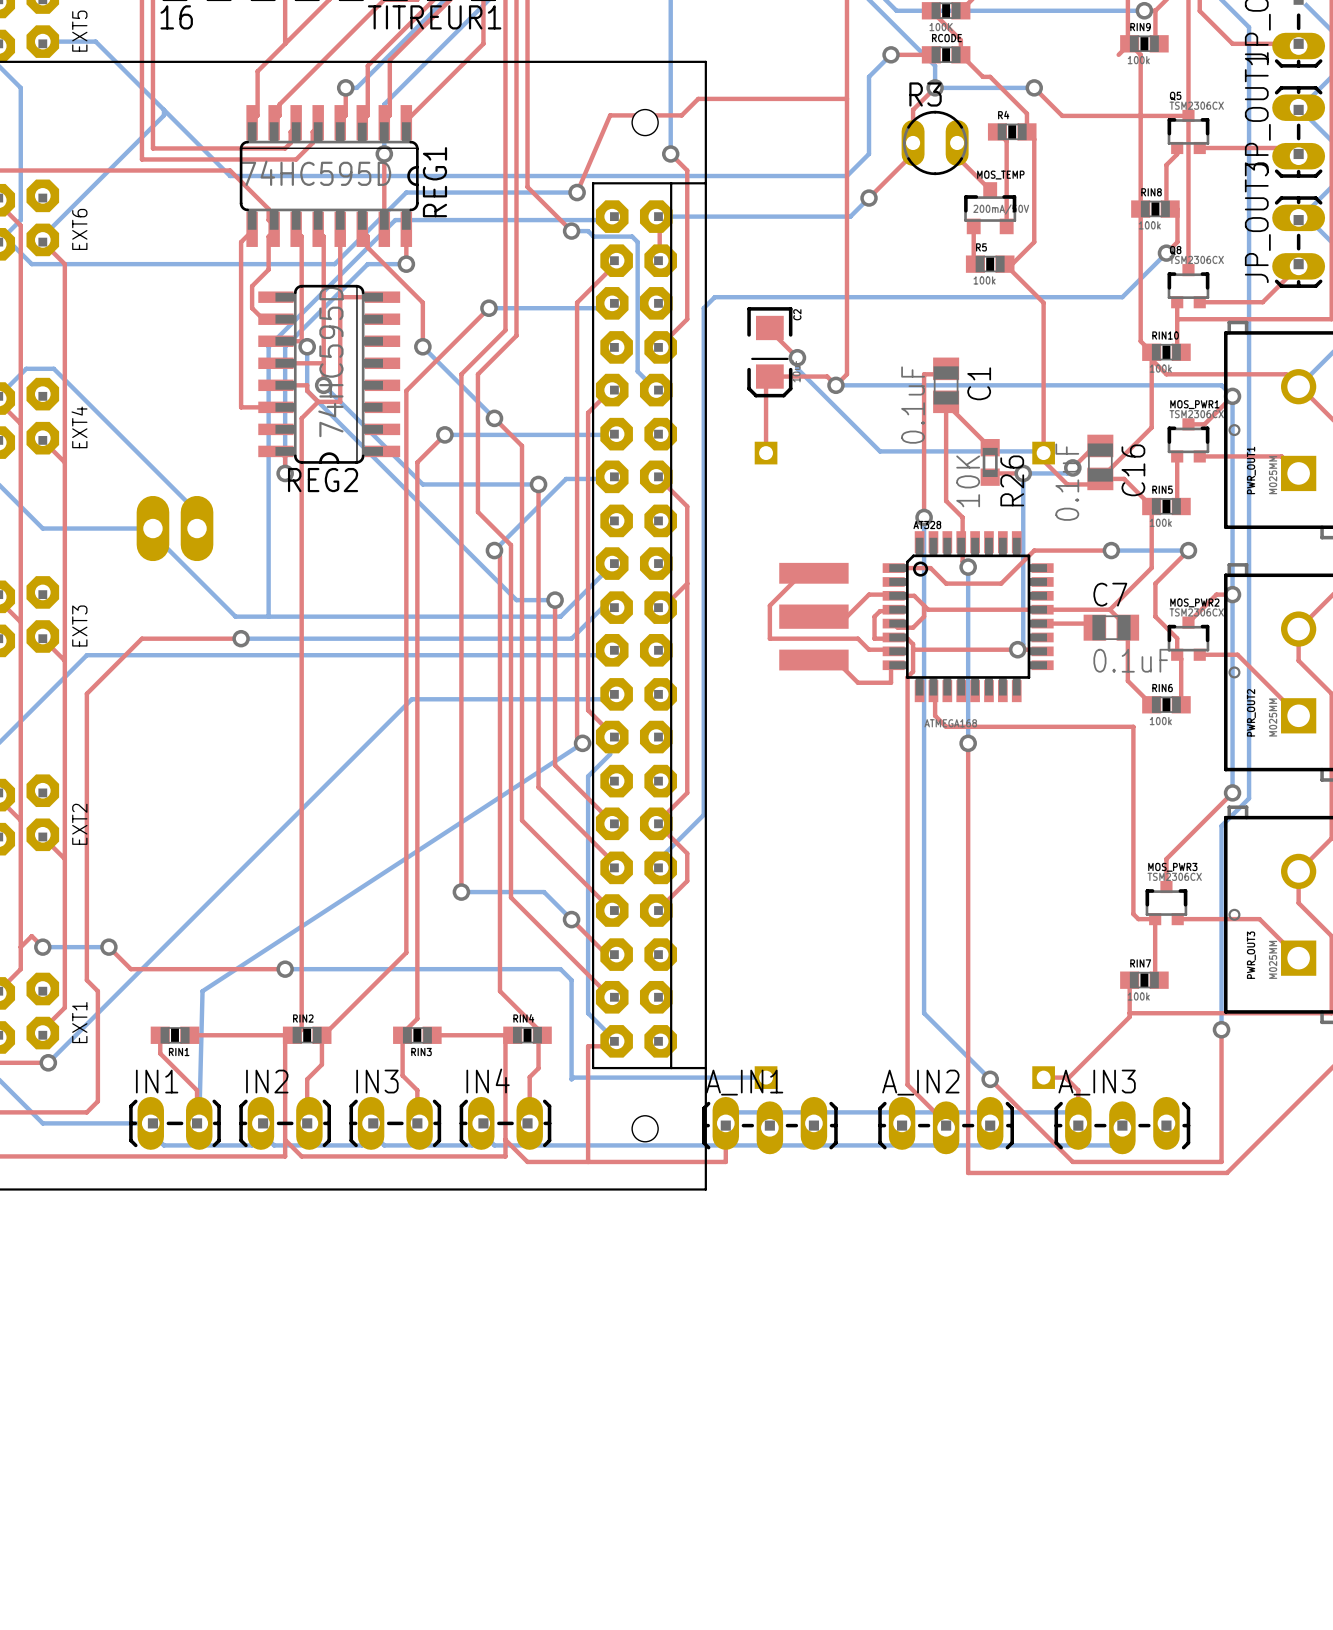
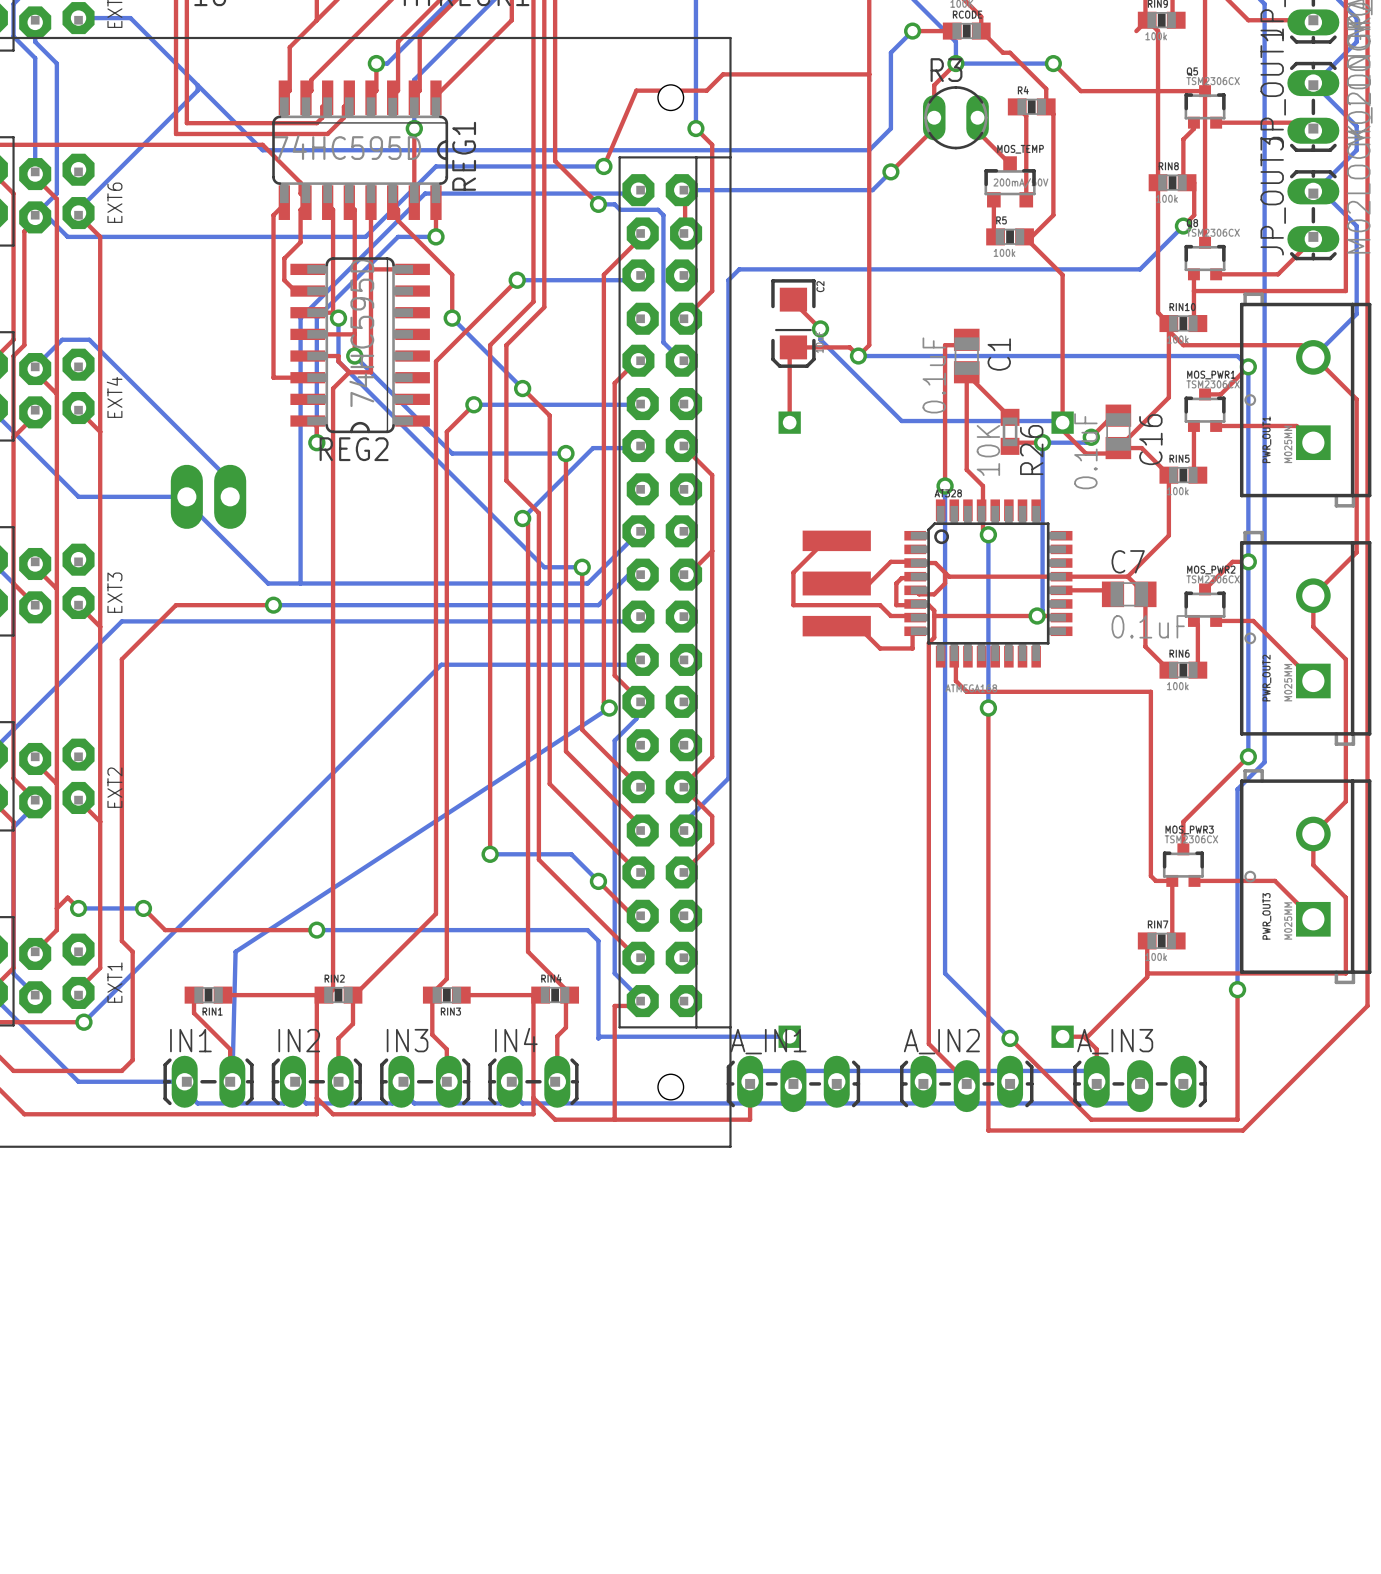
top track: (1111, 550) (1034, 550) (1001, 583) (946, 583) (930, 568) (893, 568) -> none
bottom track: (1111, 550) (1188, 550) -> none
via: (1111, 550) -> none
top track: (1188, 550) (1155, 583) (1155, 616) (1177, 638) (1177, 654) -> none
via: (1188, 550) -> none

